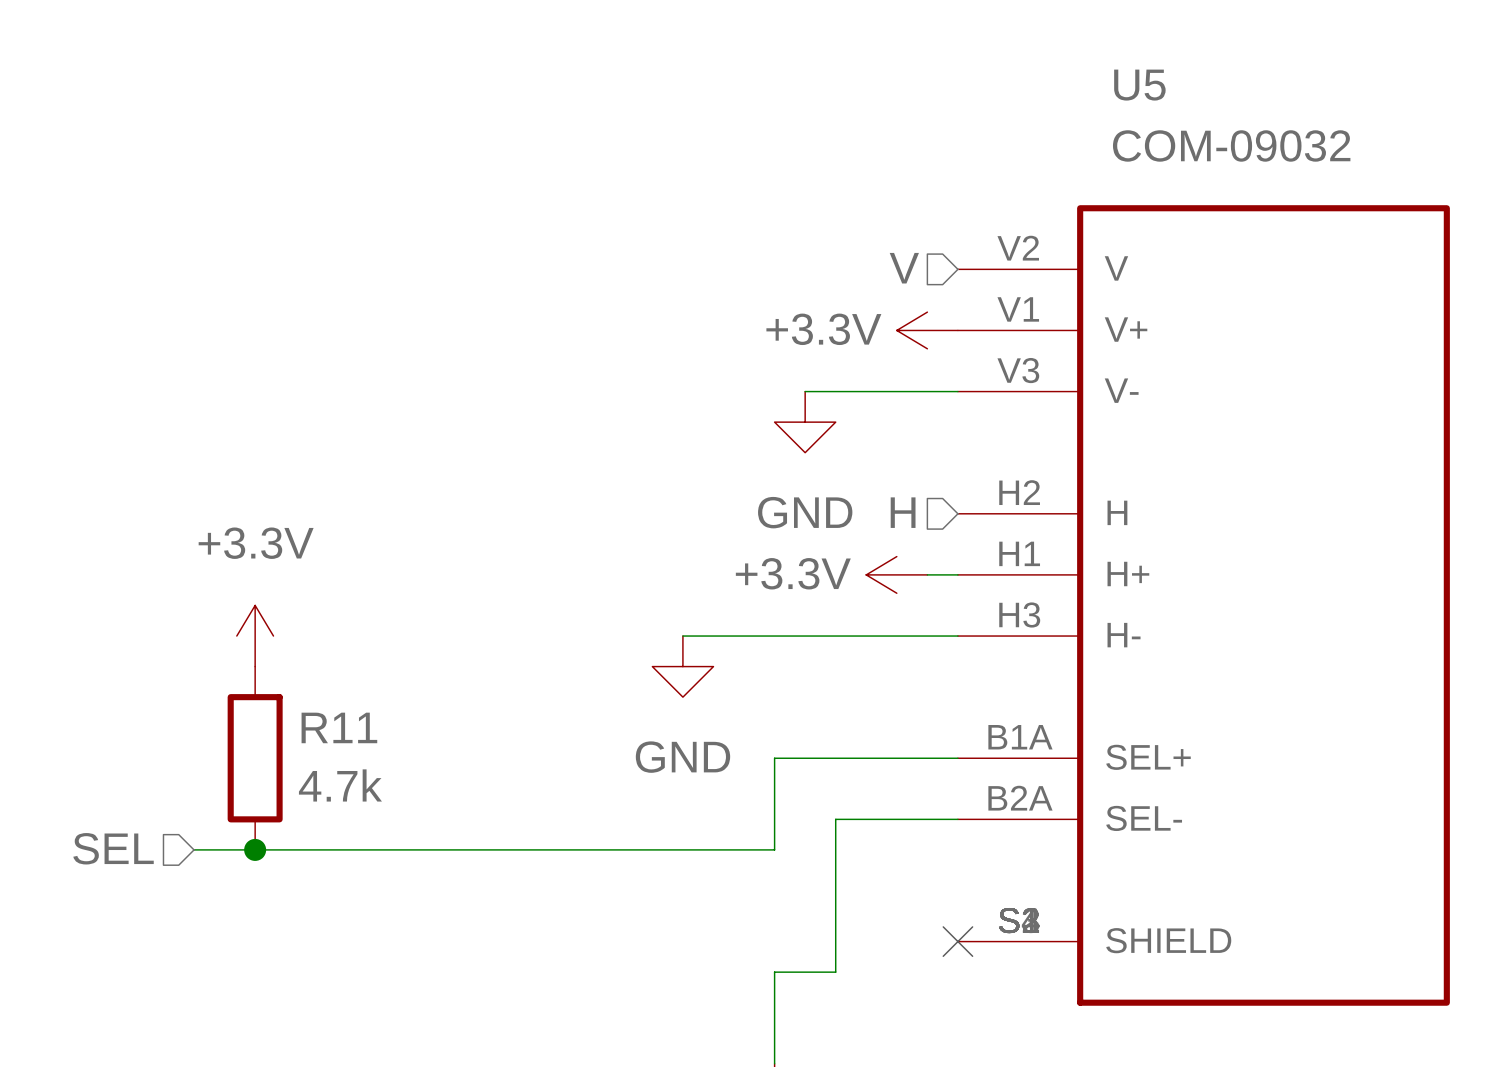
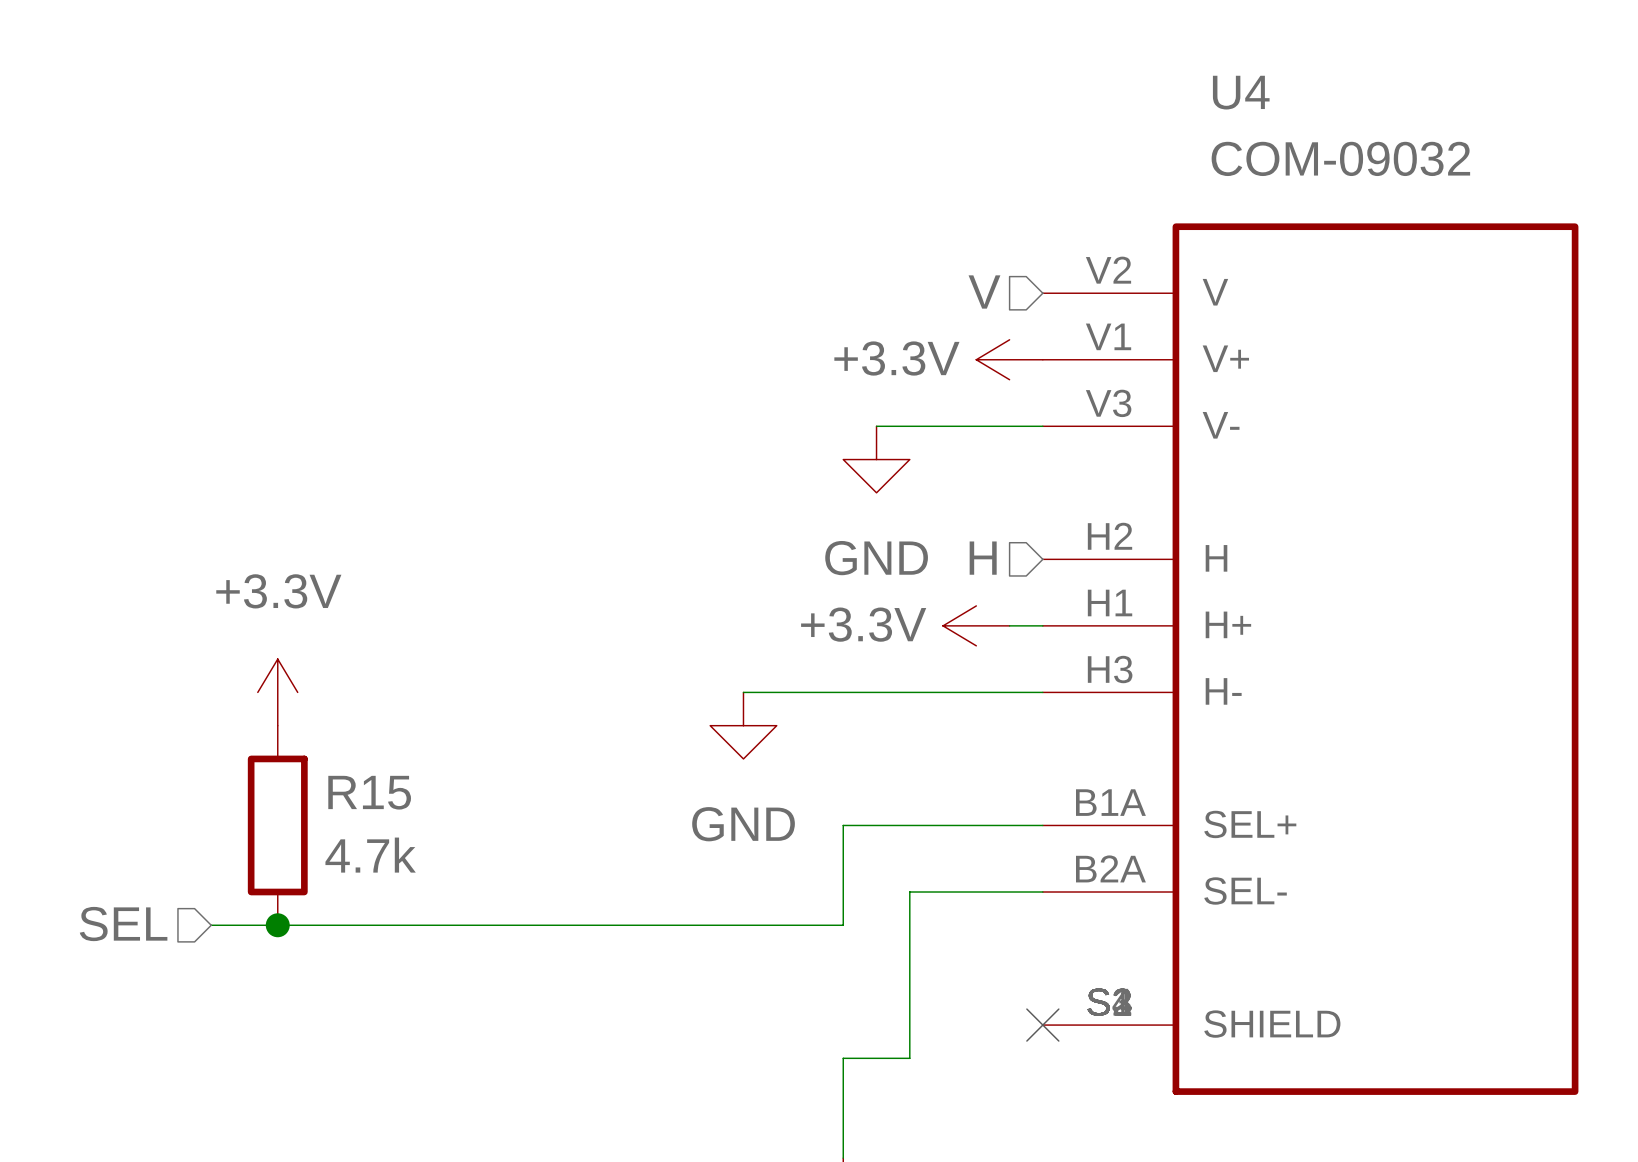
U5 name: U5 (1139, 85) -> U4 (1241, 92)
R11 name: R11 (339, 727) -> R15 (369, 792)

